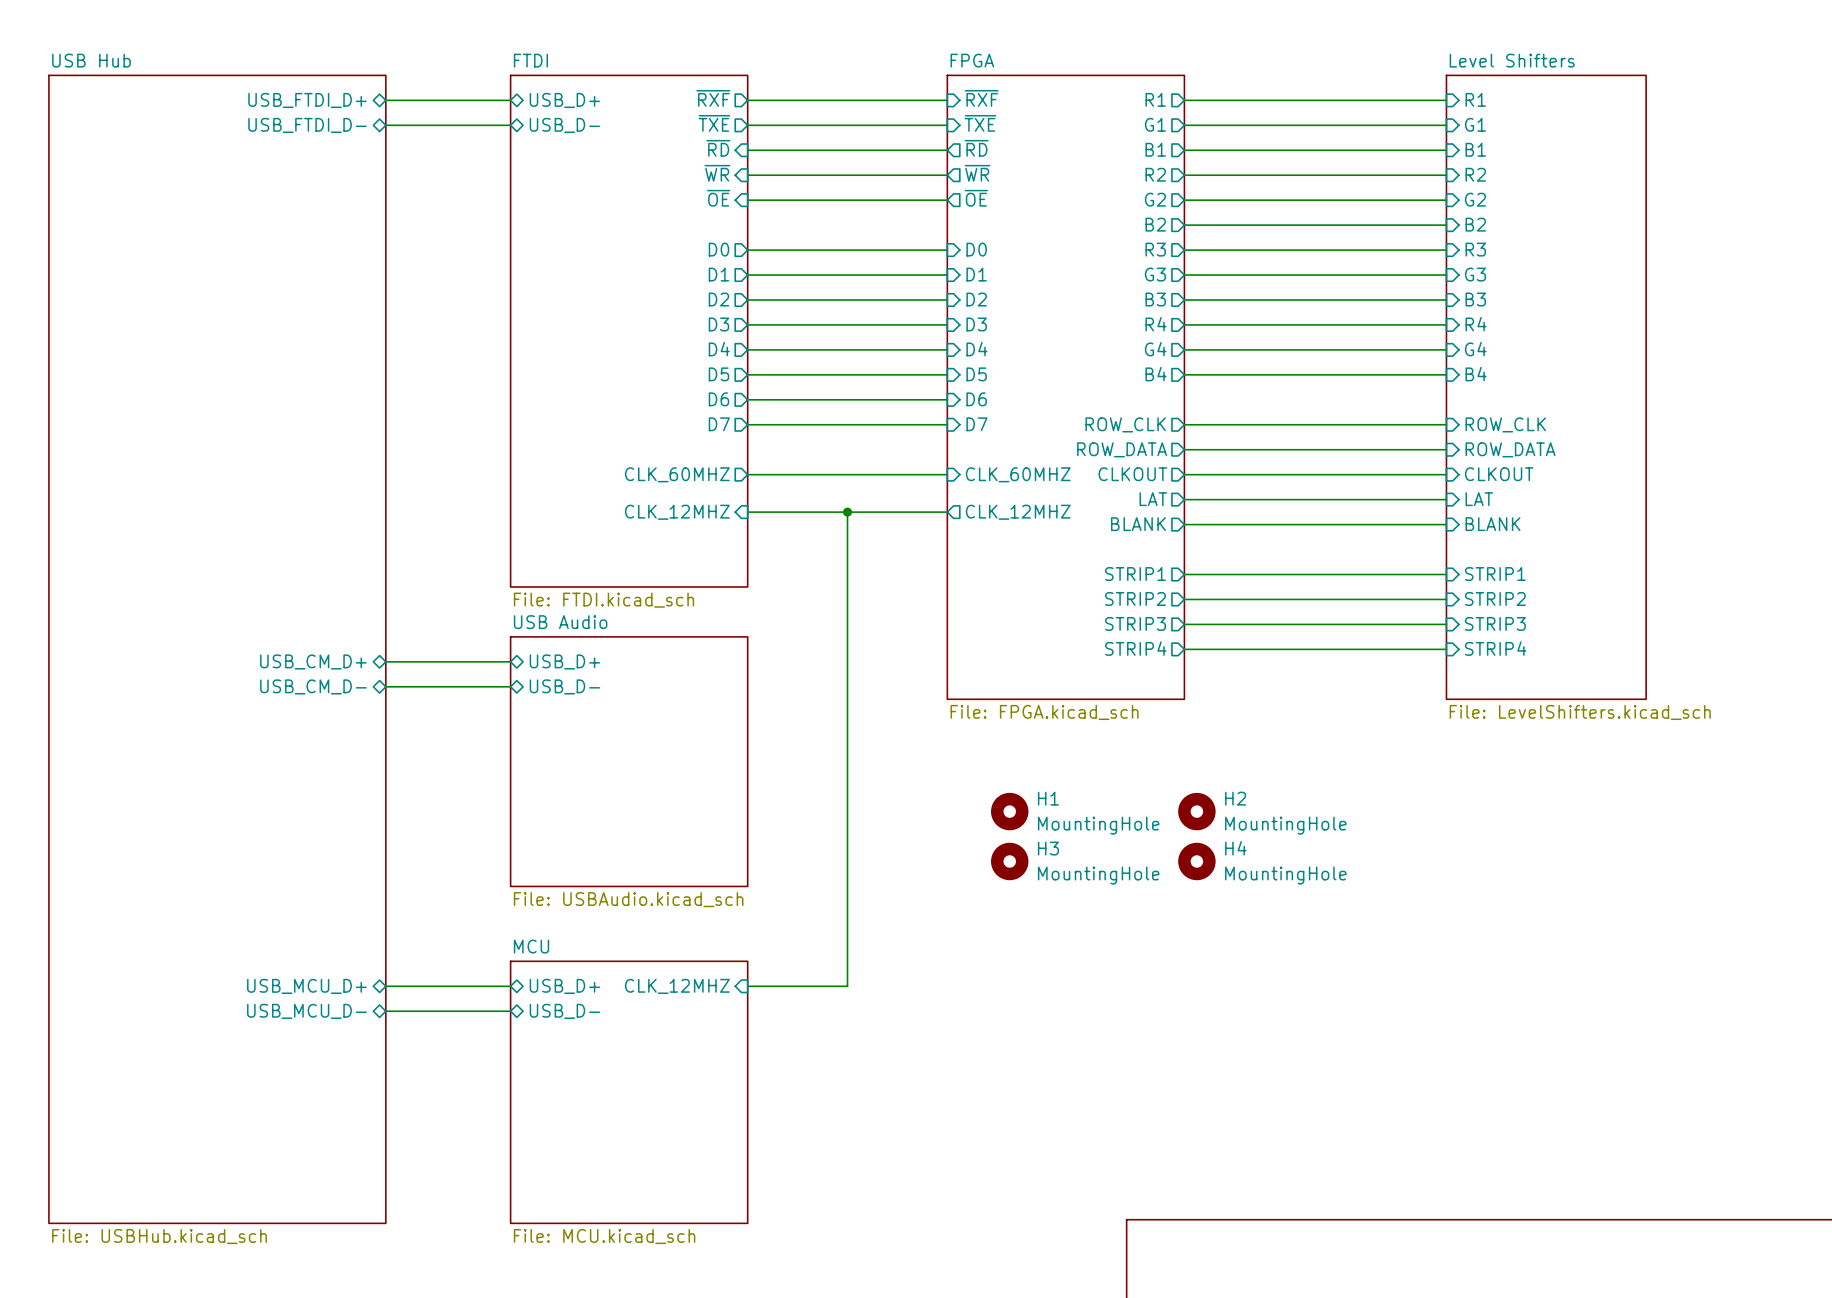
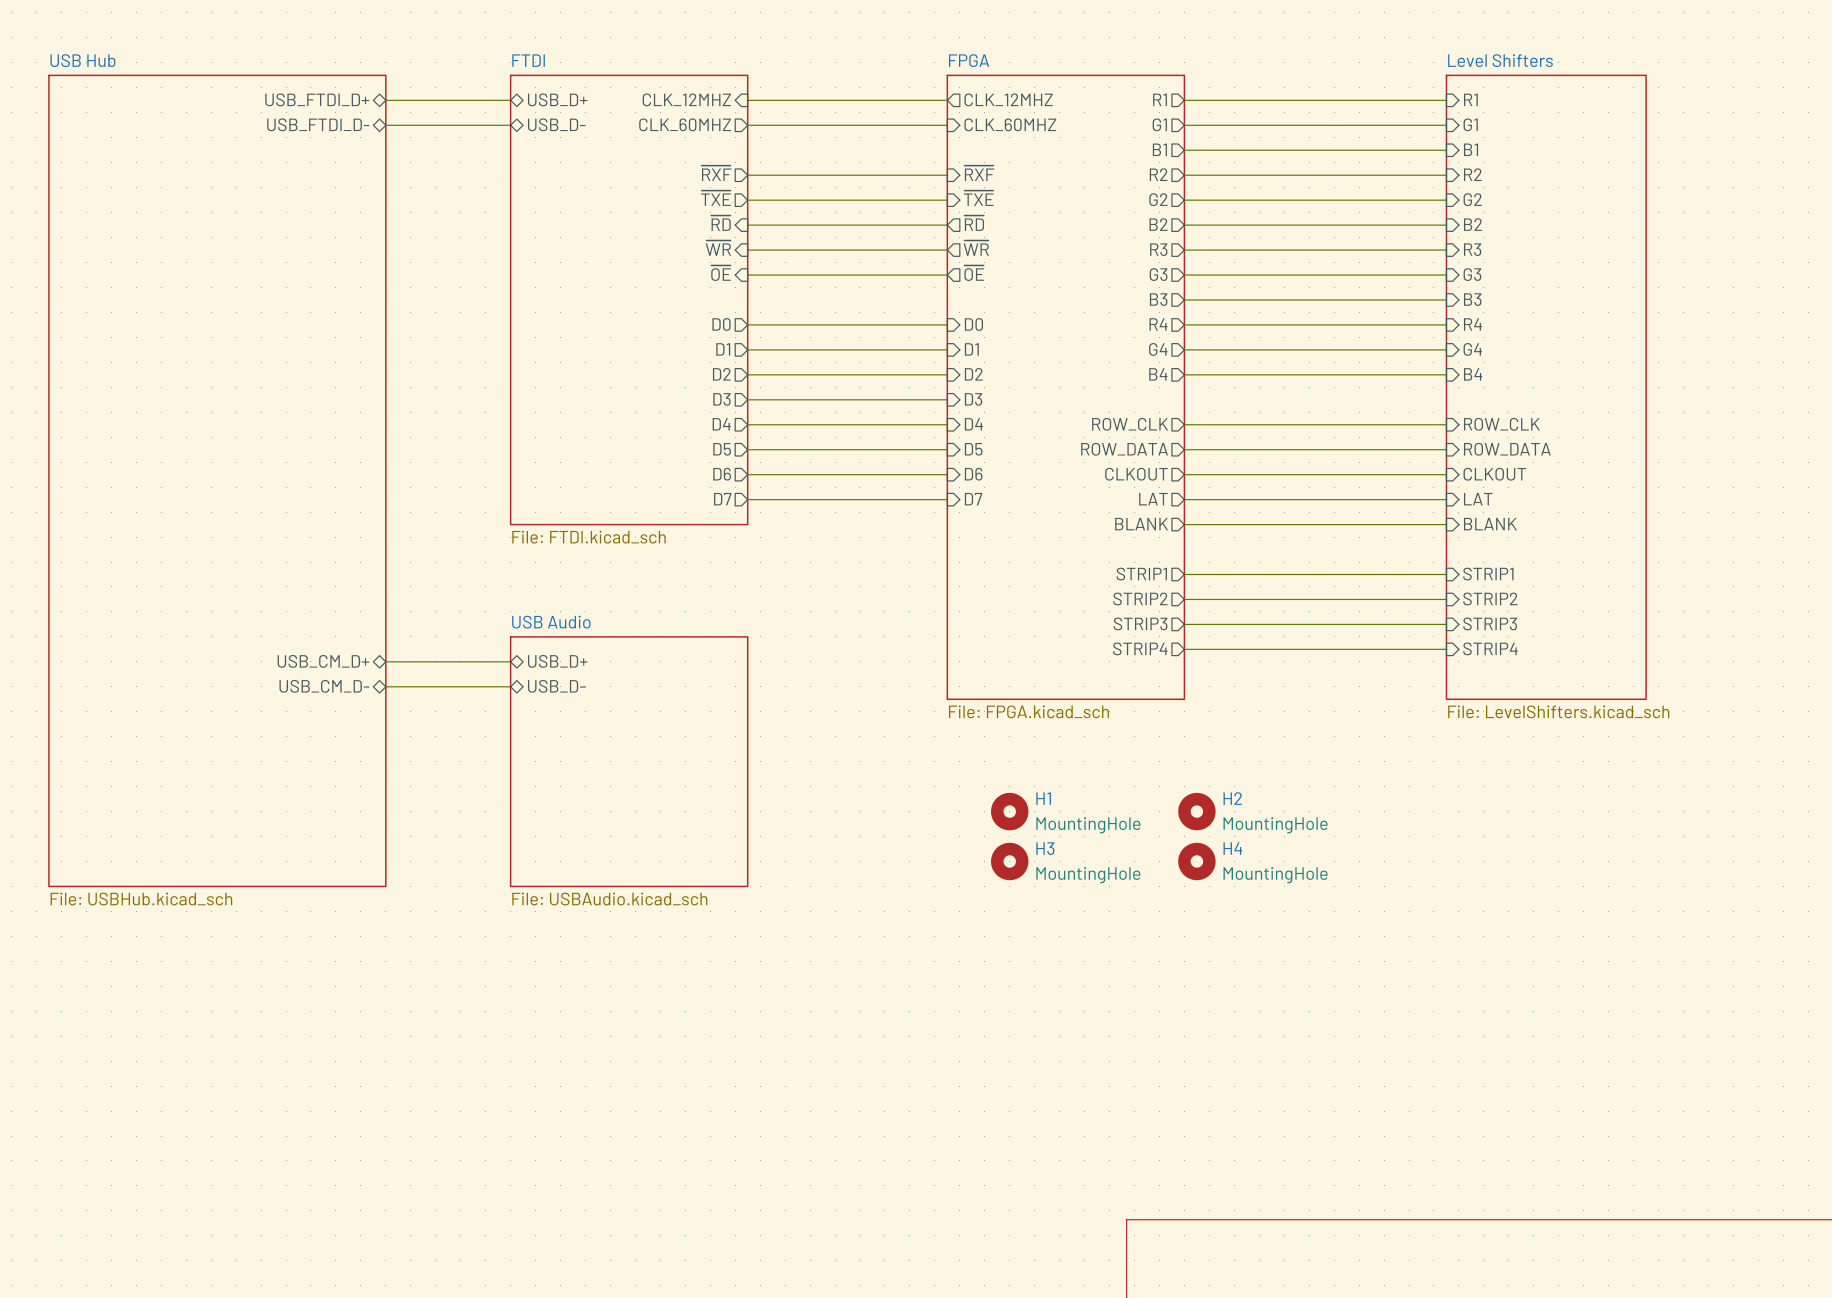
sheet pin shape: output (713, 98) -> input (686, 99)
sheet pin: ~{RXF} (713, 98) -> CLK_12MHZ (686, 99)
sheet pin shape: input (981, 98) -> output (1008, 99)
sheet pin: ~{RXF} (981, 98) -> CLK_12MHZ (1008, 99)
sheet pin: ~{TXE} (714, 123) -> CLK_60MHZ (685, 124)
sheet pin: ~{TXE} (980, 123) -> CLK_60MHZ (1010, 124)
sheet pin position: ~{RD} (718, 148) -> ~{RD} (720, 223)
sheet pin position: ~{RD} (976, 148) -> ~{RD} (974, 223)
wire: (747, 150) (947, 150) -> (747, 225) (947, 225)
sheet pin shape: input (717, 173) -> output (716, 173)
sheet pin: ~{WR} (717, 173) -> ~{RXF} (716, 173)
sheet pin shape: output (977, 173) -> input (979, 173)
sheet pin: ~{WR} (977, 173) -> ~{RXF} (979, 173)
sheet pin shape: input (718, 198) -> output (716, 198)
sheet pin: ~{OE} (718, 198) -> ~{TXE} (716, 198)
sheet pin shape: output (976, 198) -> input (978, 198)
sheet pin: ~{OE} (976, 198) -> ~{TXE} (978, 198)
sheet pin shape: output (718, 249) -> input (718, 248)
sheet pin: D0 (718, 249) -> ~{WR} (718, 248)
sheet pin shape: input (976, 249) -> output (976, 248)
sheet pin: D0 (976, 249) -> ~{WR} (976, 248)
sheet pin shape: output (718, 274) -> input (721, 273)
sheet pin: D1 (718, 274) -> ~{OE} (721, 273)
sheet pin shape: input (976, 274) -> output (974, 273)
sheet pin: D1 (976, 274) -> ~{OE} (974, 273)
sheet FTDI: none -> File: FTDI.kicad_sch (629, 299)
sheet pin: D2 (718, 299) -> none
wire: (747, 299) (947, 299) -> (747, 449) (947, 449)
sheet pin: D2 (976, 299) -> none
sheet pin: D3 (718, 324) -> D0 (721, 324)
sheet pin: D3 (976, 324) -> D0 (973, 324)
sheet FTDI: File: FTDI.kicad_sch (629, 331) -> none
sheet pin: D4 (719, 349) -> D1 (723, 349)
sheet pin: D4 (976, 349) -> D1 (971, 349)
sheet pin: D5 (718, 374) -> D2 (721, 374)
sheet pin: D5 (976, 374) -> D2 (973, 374)
sheet pin: D6 (718, 399) -> D3 (722, 399)
sheet pin: D6 (976, 399) -> D3 (973, 399)
sheet pin: D7 (719, 424) -> D4 (721, 424)
sheet pin: D7 (976, 424) -> D4 (973, 424)
sheet pin: none -> D5 (722, 449)
sheet pin: none -> D5 (973, 449)
sheet pin: CLK_60MHZ (677, 474) -> D6 (722, 474)
sheet pin: CLK_60MHZ (1018, 474) -> D6 (973, 474)
sheet USB Hub: none -> File: USBHub.kicad_sch (217, 480)
sheet pin: none -> D7 (722, 499)
sheet pin: none -> D7 (973, 499)
sheet pin: CLK_12MHZ (677, 512) -> none
wire: (747, 512) (947, 512) -> (747, 499) (947, 499)
wire: (847, 512) (847, 986) (747, 986) -> none
junction: (847, 512) -> none
sheet pin: CLK_12MHZ (1018, 512) -> none
sheet USB Hub: File: USBHub.kicad_sch (217, 649) -> none
sheet pin: USB_MCU_D+ (306, 986) -> none
wire: (385, 986) (510, 986) -> none
sheet pin: USB_D+ (564, 986) -> none
sheet pin: CLK_12MHZ (677, 986) -> none
sheet pin: USB_MCU_D- (306, 1011) -> none
wire: (385, 1011) (510, 1011) -> none
sheet pin: USB_D- (564, 1011) -> none
sheet MCU: File: MCU.kicad_sch (629, 1092) -> none

